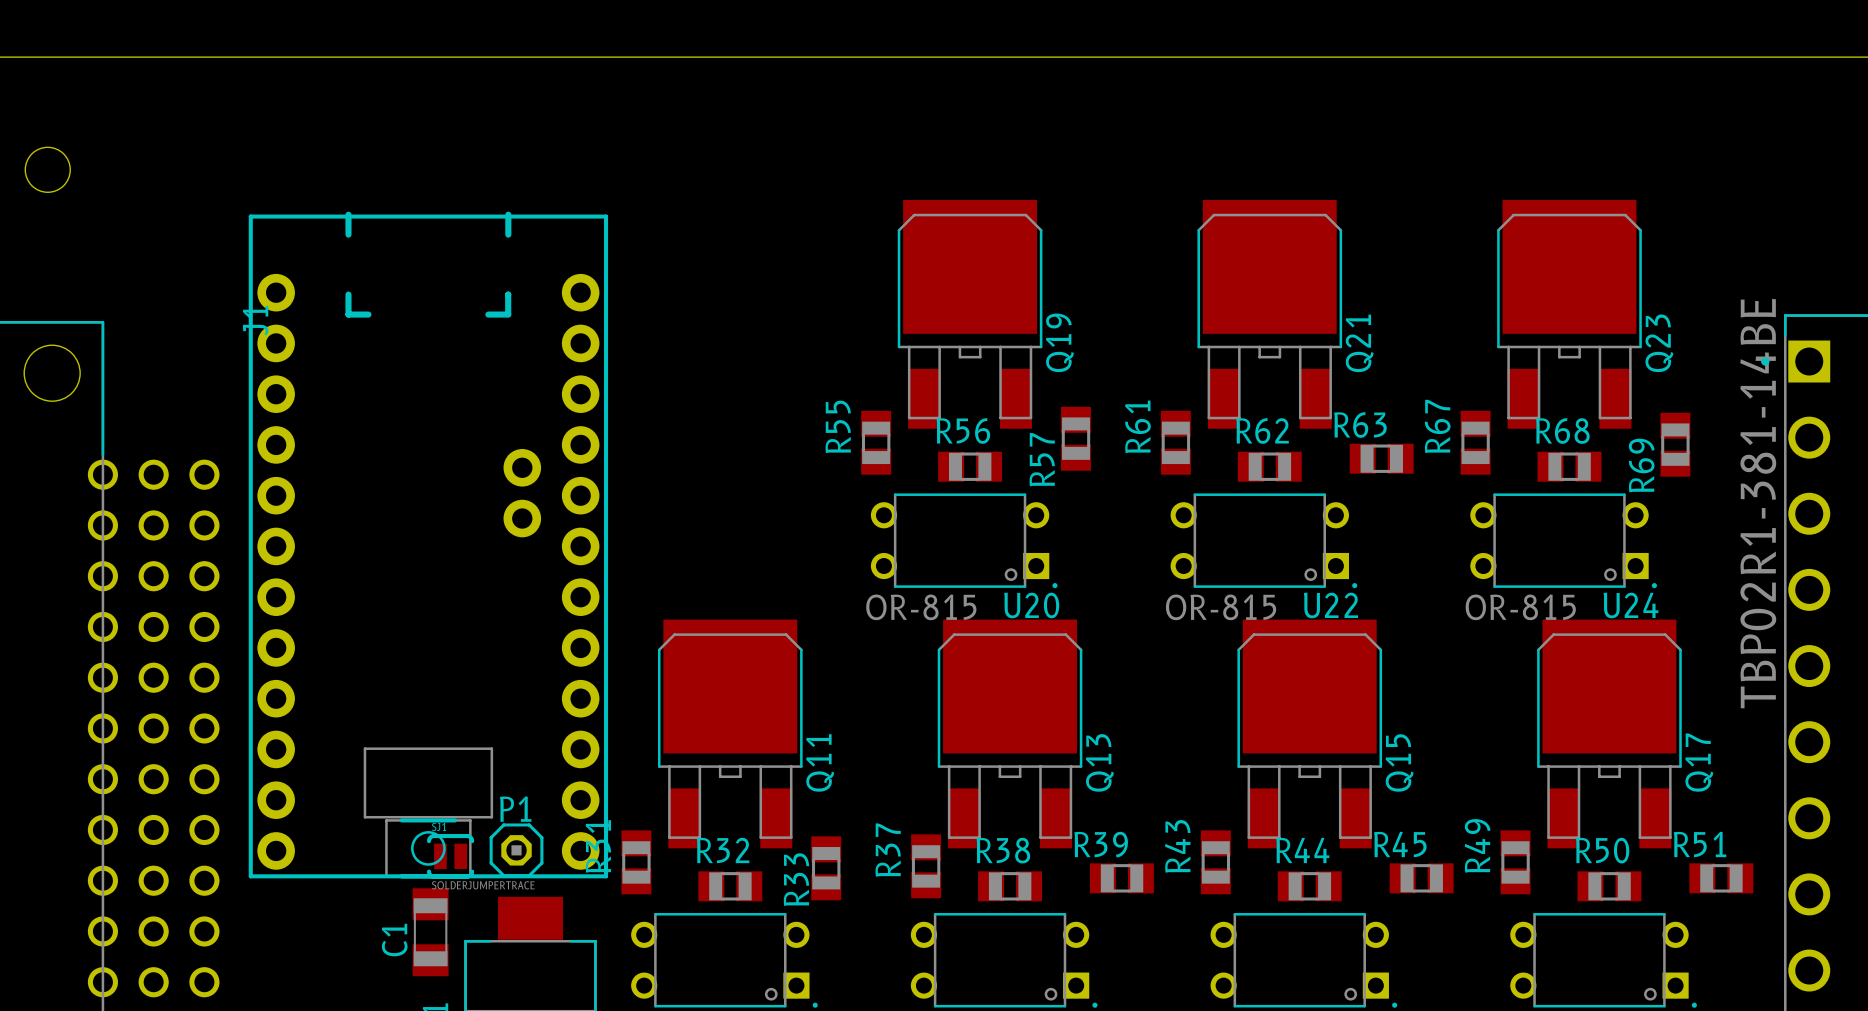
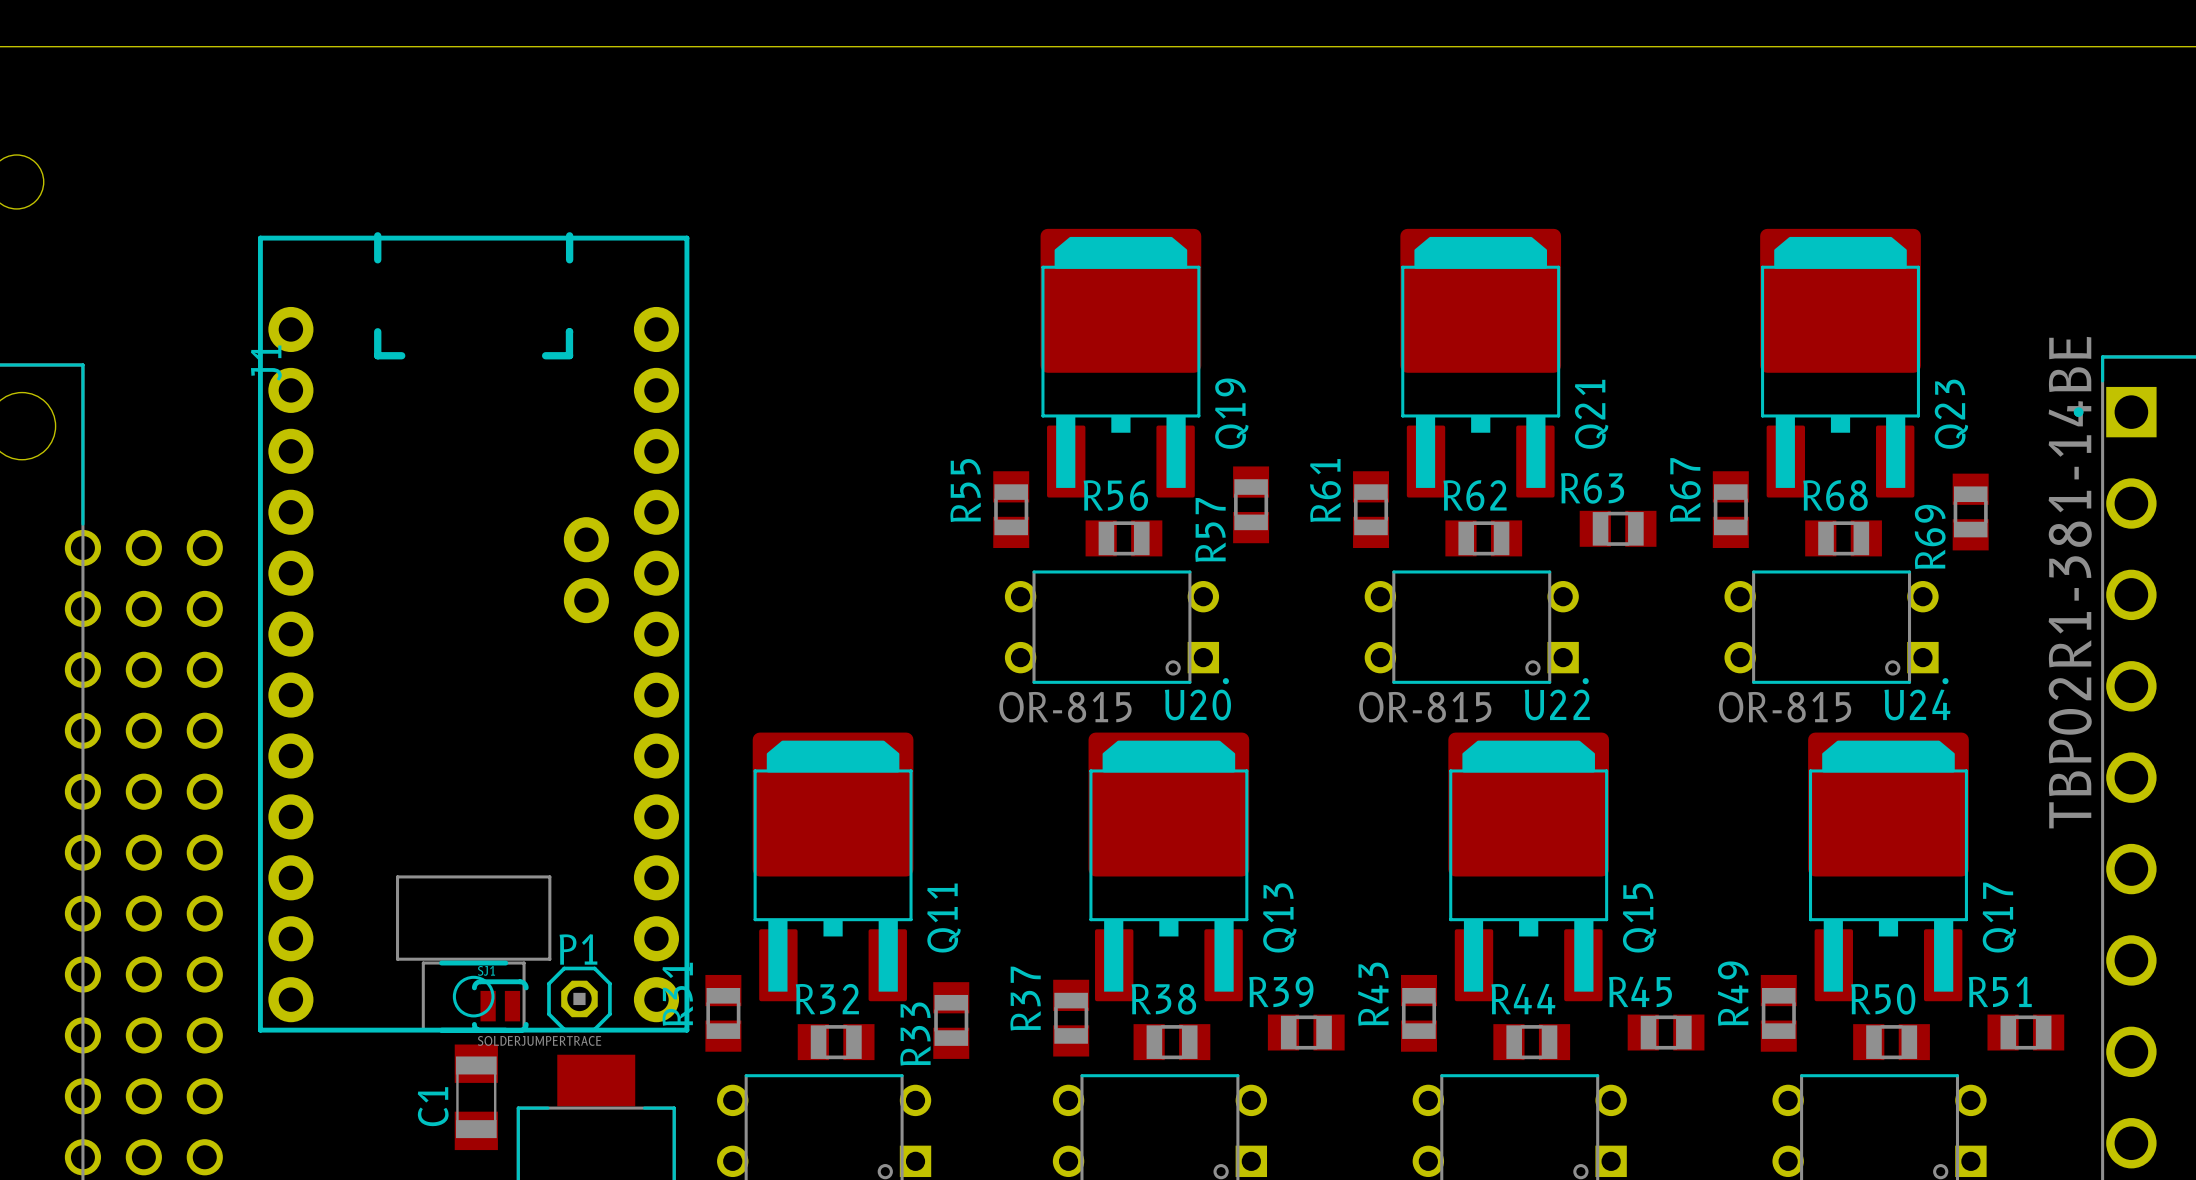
Q19 footprint: [897, 199, 1043, 429] -> [1040, 228, 1202, 498]
Q21 footprint: [1197, 199, 1343, 429] -> [1400, 228, 1562, 498]
Q23 footprint: [1497, 199, 1642, 429] -> [1760, 228, 1921, 498]
Q11 footprint: [657, 619, 803, 849] -> [752, 732, 914, 1002]
Q13 footprint: [937, 619, 1083, 849] -> [1088, 732, 1250, 1002]
Q15 footprint: [1237, 619, 1383, 849] -> [1448, 732, 1610, 1002]
Q17 footprint: [1537, 619, 1682, 849] -> [1808, 732, 1969, 1002]

